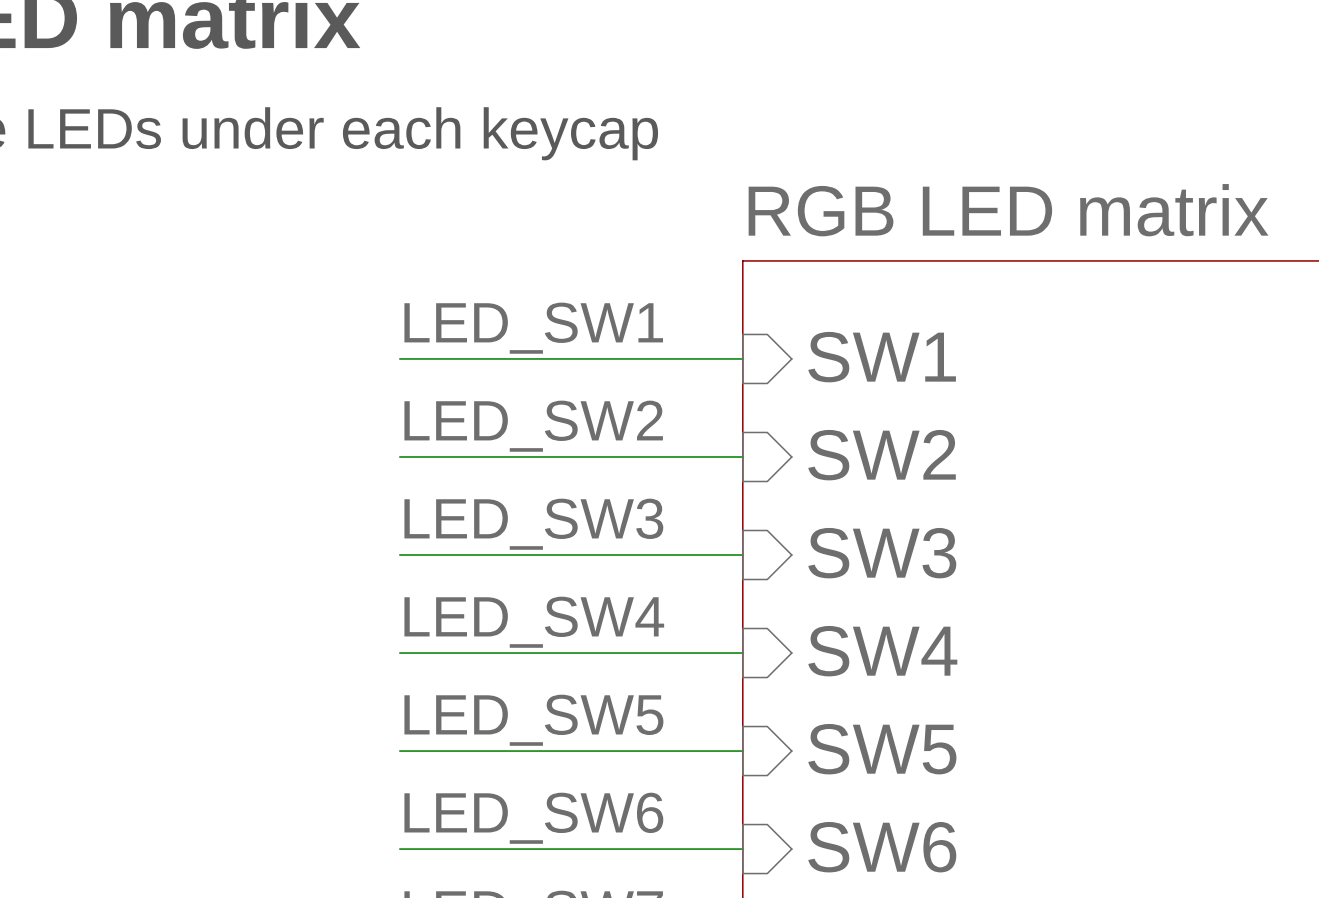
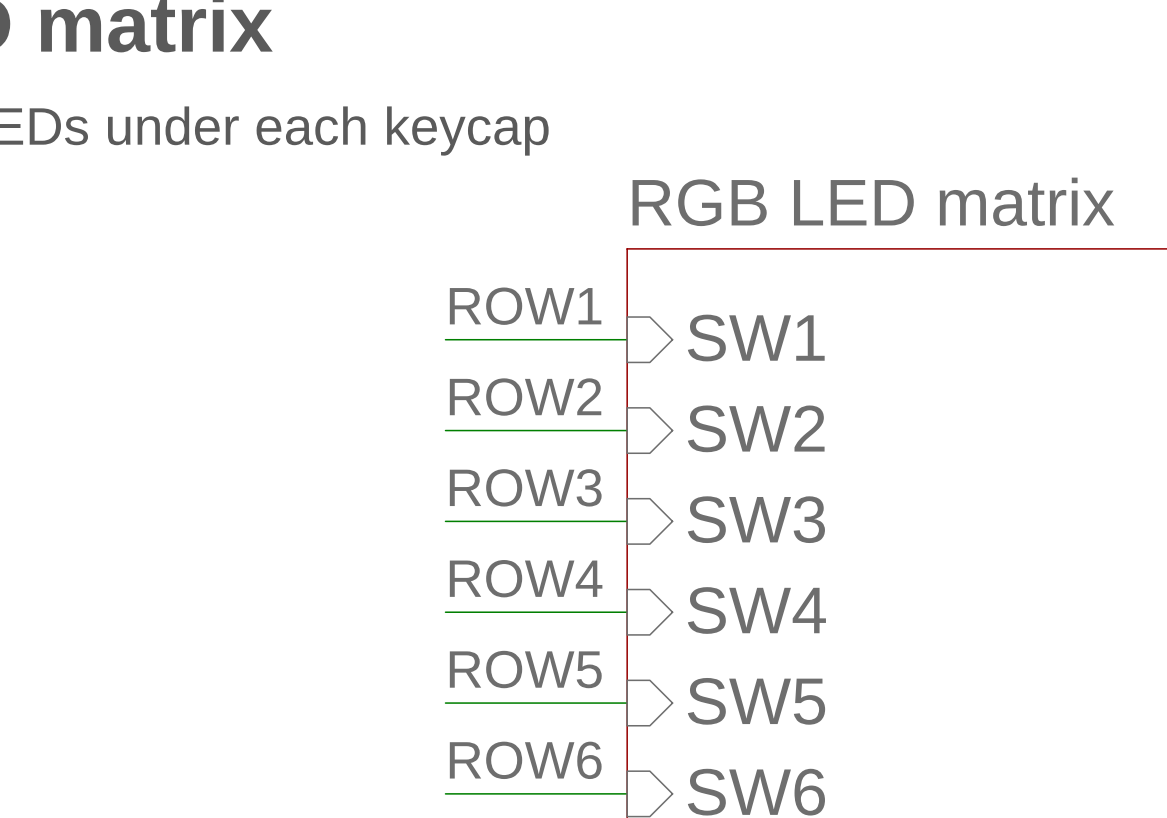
label: none -> ROW1 (525, 306)
label: LED_SW1 (533, 328) -> none
wire: (399, 358) (546, 358) -> none
label: none -> ROW2 (525, 397)
label: LED_SW2 (533, 426) -> none
wire: (399, 456) (546, 456) -> none
label: none -> ROW3 (525, 487)
label: LED_SW3 (533, 524) -> none
wire: (399, 555) (546, 555) -> none
label: none -> ROW4 (526, 578)
label: LED_SW4 (534, 622) -> none
wire: (399, 653) (546, 653) -> none
label: none -> ROW5 (525, 669)
label: LED_SW5 (533, 720) -> none
wire: (399, 751) (546, 751) -> none
label: none -> ROW6 (525, 760)
label: LED_SW6 (533, 818) -> none
wire: (399, 849) (546, 849) -> none

